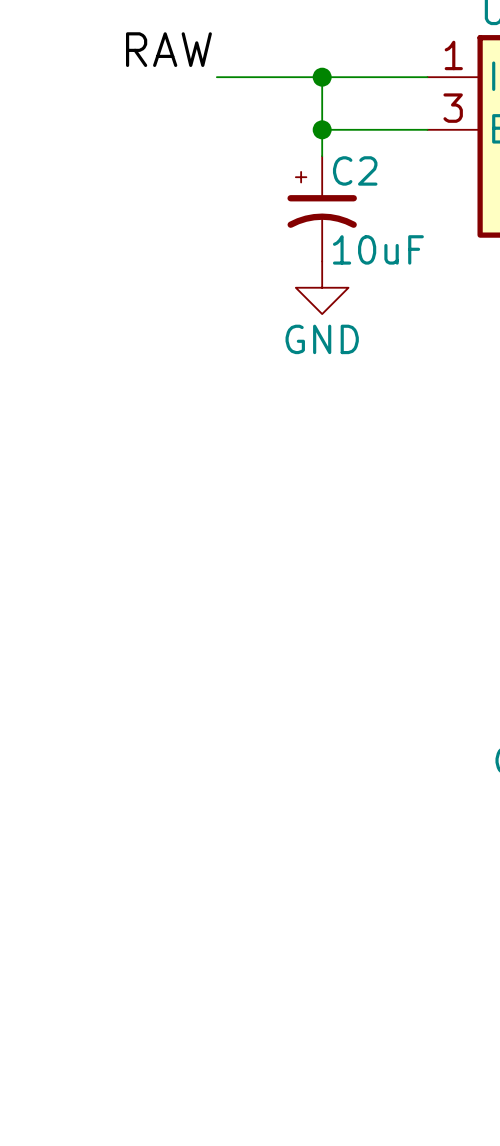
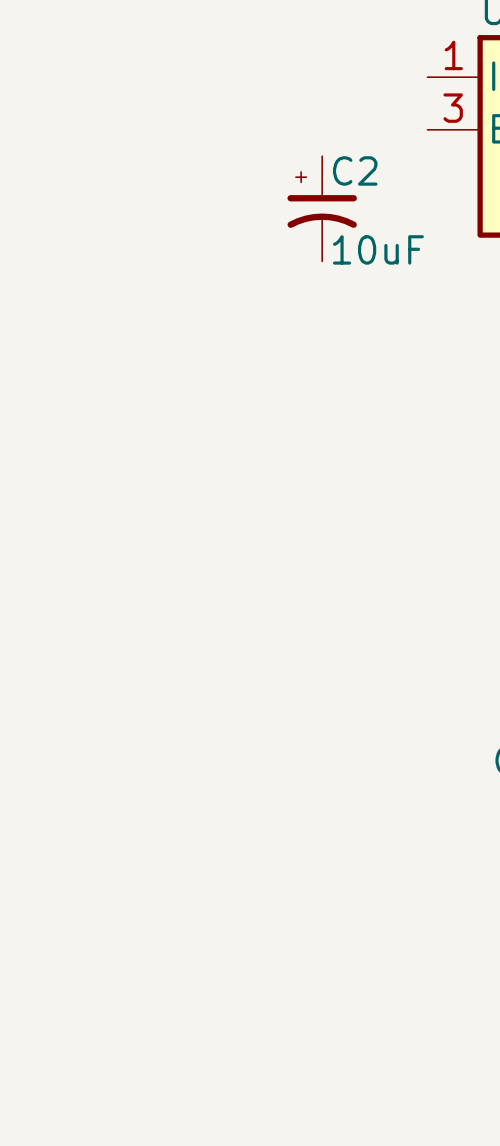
label: RAW (168, 49) -> none
wire: (216, 77) (427, 77) -> none
wire: (322, 77) (322, 156) -> none
junction: (322, 77) -> none
wire: (322, 129) (427, 129) -> none
junction: (322, 129) -> none
power symbol: GND (322, 287) -> none

